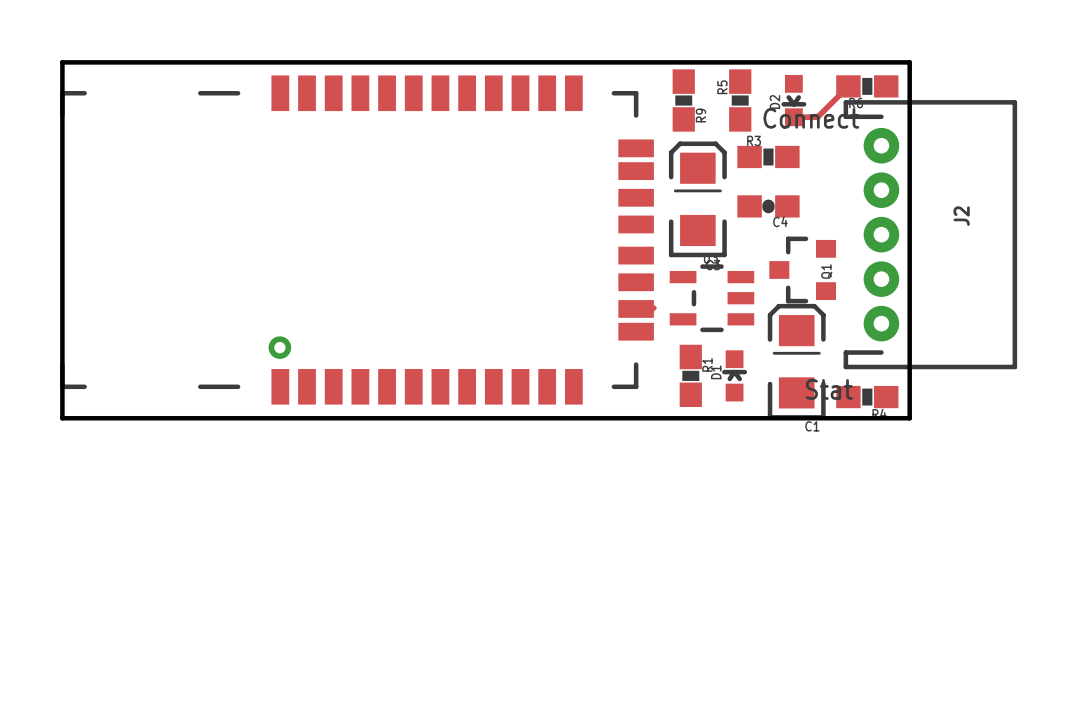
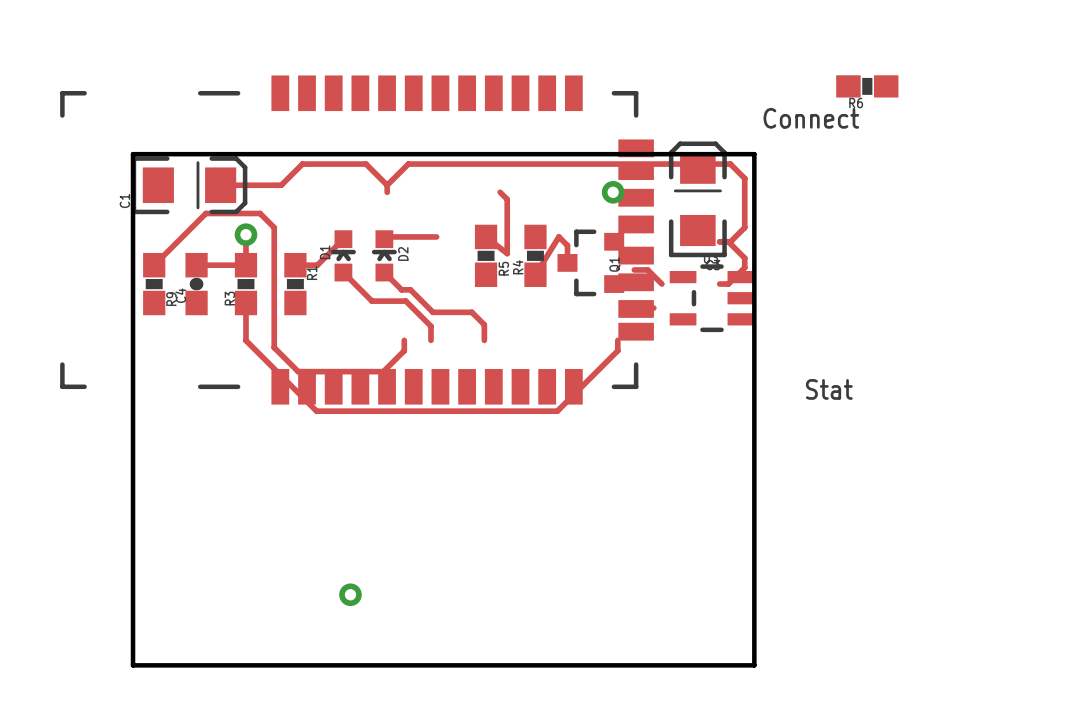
board edge: (62, 62) (909, 62) (909, 418) (62, 418) (62, 62) -> none
track: (848, 86) (817, 117) (793, 117) -> none
R5 name position: R5 (722, 87) -> R5 (503, 268)
R9 position: (683, 100) -> (154, 284)
R5 position: (740, 100) -> (486, 255)
D2 rotation: 0° (793, 100) -> 180° (384, 255)
D2 position: (793, 100) -> (384, 255)
board edge: none -> (133, 154) (754, 154) (754, 665) (133, 665) (133, 154)
R3 rotation: 0° (768, 157) -> 90° clockwise (245, 284)
R3 position: (768, 157) -> (245, 284)
track: none -> (220, 185) (281, 185) (302, 164) (366, 164) (387, 185)
track: none -> (387, 185) (387, 192)
track: none -> (387, 185) (408, 164) (730, 164) (744, 178) (744, 227) (730, 241) (719, 241)
track: none -> (500, 192) (507, 199) (507, 253) (486, 236)
via: none -> (613, 192)
C4 rotation: 0° (768, 206) -> 90° clockwise (196, 284)
C4 position: (768, 206) -> (196, 284)
track: none -> (245, 234) (245, 265) (196, 265)
J2: (930, 234) -> none
track: none -> (436, 236) (386, 236) (384, 239)
track: none -> (343, 239) (317, 265) (295, 265)
track: none -> (728, 241) (744, 258) (744, 267) (728, 284) (719, 284)
track: none -> (567, 262) (567, 245) (558, 236) (535, 274)
track: none -> (154, 265) (205, 213) (260, 213) (274, 227) (274, 347) (298, 371) (383, 371) (404, 350) (404, 340)
track: none -> (634, 269) (647, 269) (661, 284)
Q1 position: (802, 269) -> (590, 262)
track: none -> (343, 272) (372, 301) (405, 301) (430, 326) (430, 340)
track: none -> (384, 272) (401, 289) (410, 289) (433, 312) (471, 312) (484, 324) (484, 340)
track: none -> (245, 302) (245, 340) (316, 411) (557, 411) (617, 350) (617, 340)
via position: (279, 347) -> (245, 234)
C1 rotation: 0° (796, 361) -> 90° clockwise (189, 185)
C1 position: (796, 361) -> (189, 185)
R1 position: (690, 375) -> (295, 284)
D1 position: (734, 375) -> (343, 255)
R4 rotation: 0° (867, 397) -> 90° clockwise (535, 255)
R4 position: (867, 397) -> (535, 255)
via: none -> (350, 594)

